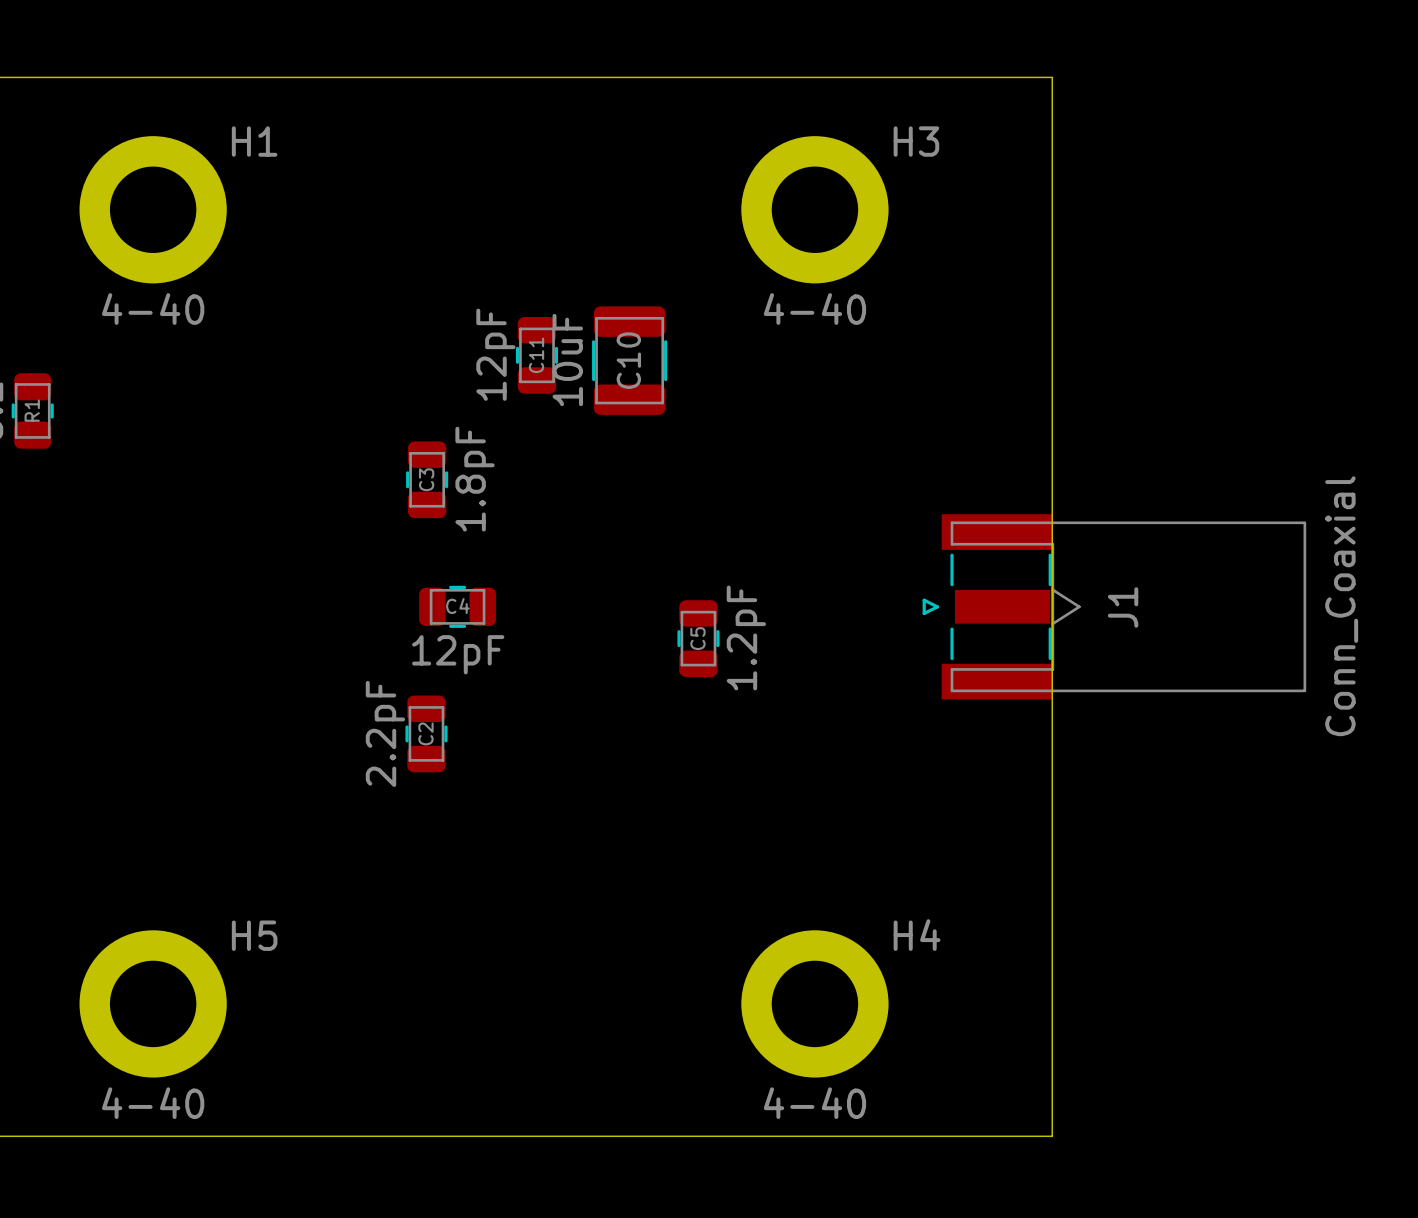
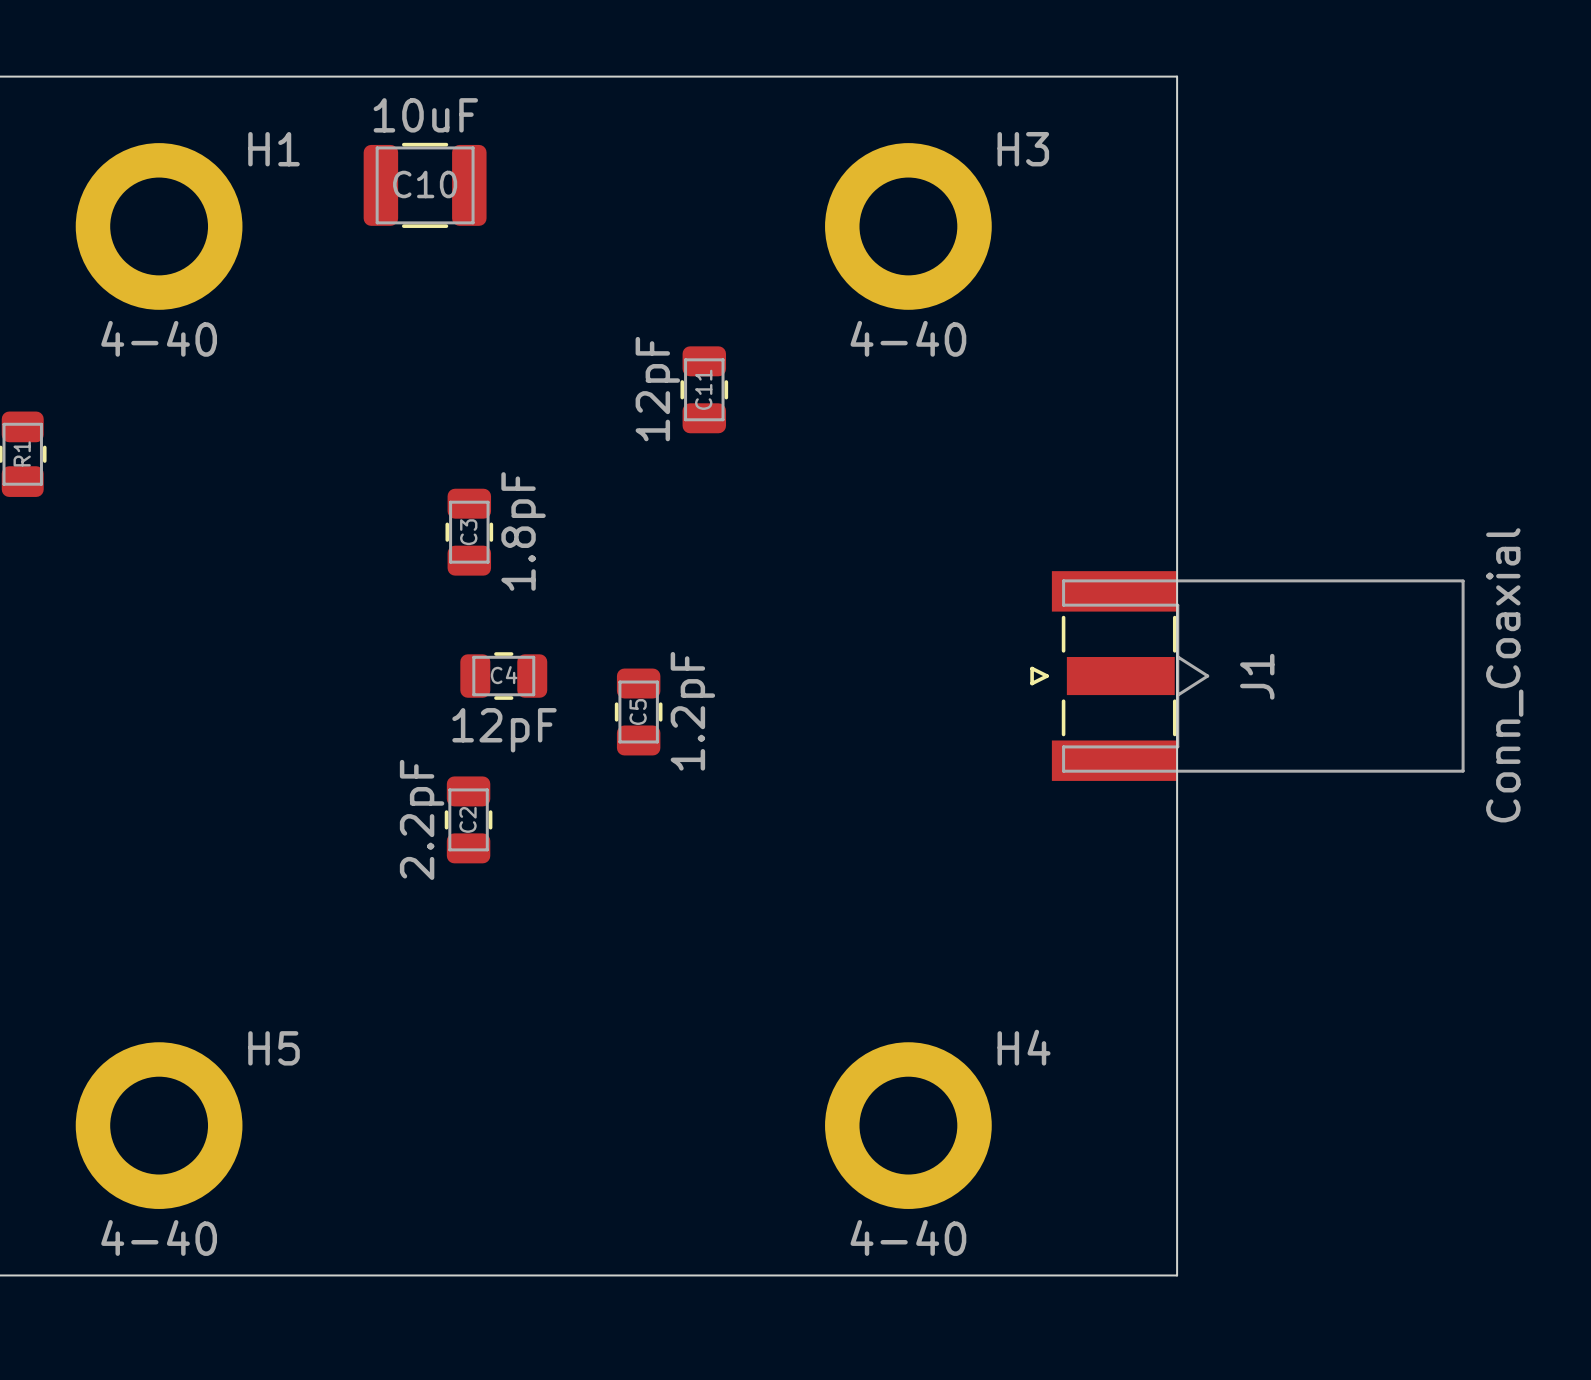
C11 position: (536, 355) -> (704, 389)
C10 rotation: 0° (629, 360) -> 90° clockwise (425, 185)
C10 position: (629, 360) -> (425, 185)
C5 position: (698, 638) -> (638, 712)

